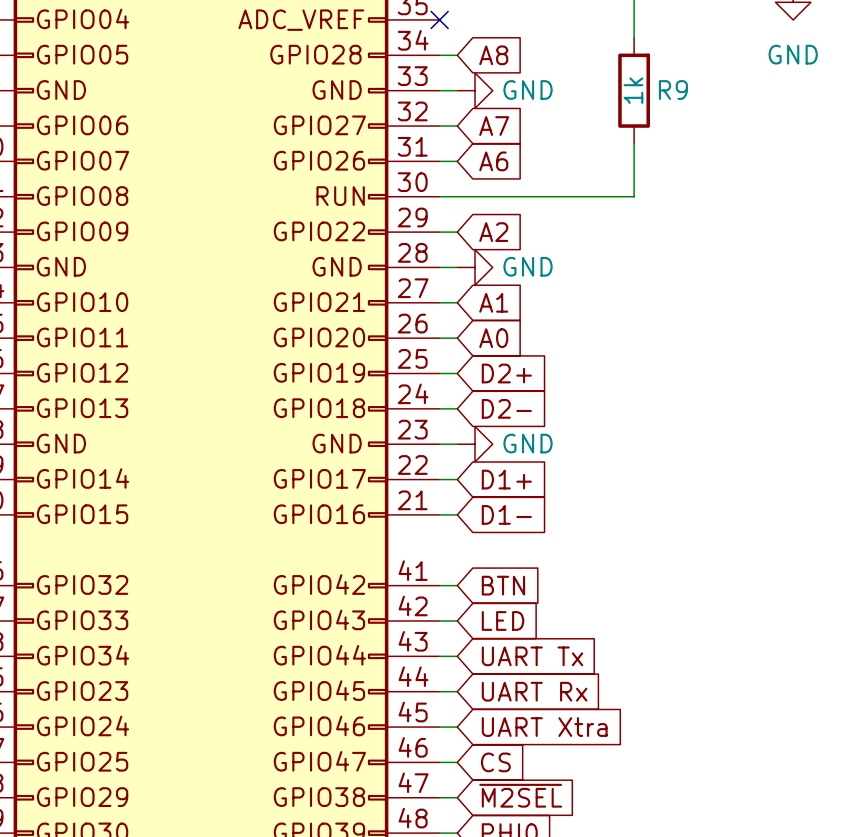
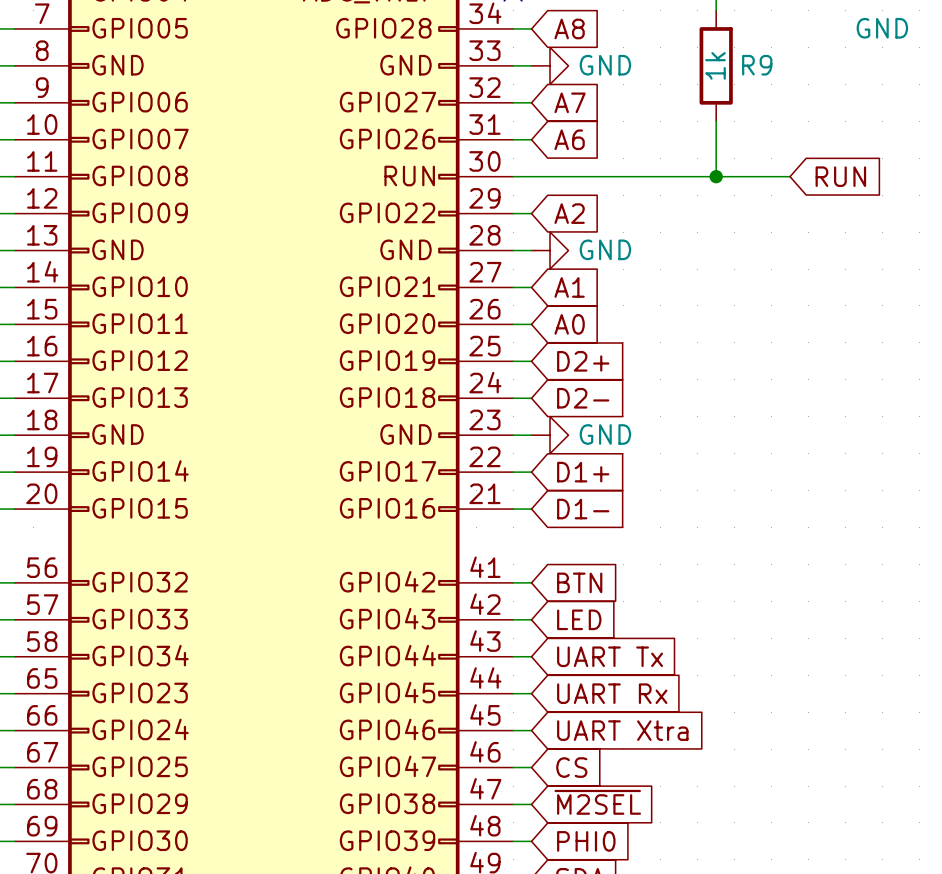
wire: none -> (716, 176) (790, 176)
junction: none -> (716, 176)
global label: none -> RUN (840, 176)

